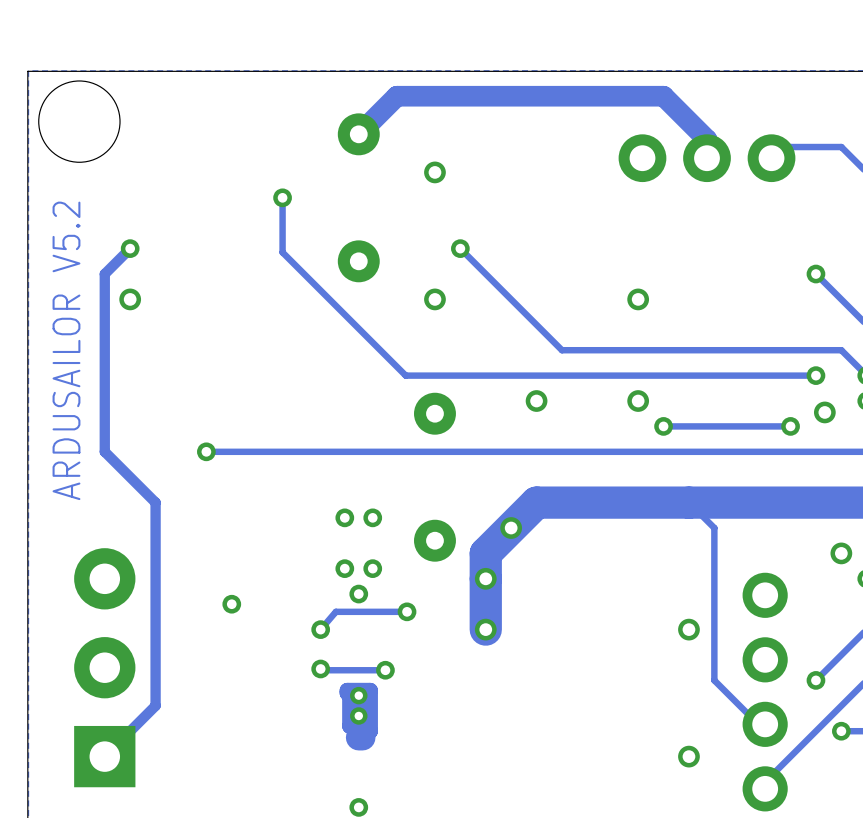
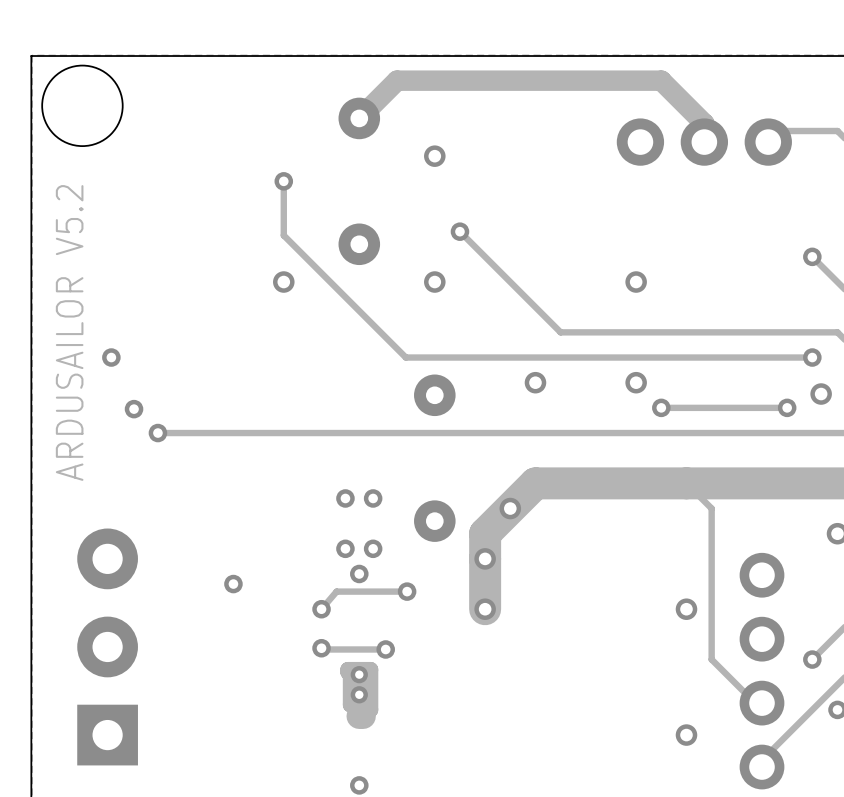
track: (130, 248) (104, 274) (104, 451) (155, 502) (155, 705) (104, 756) -> none
via: (130, 248) -> none
via position: (130, 299) -> (283, 282)
via: none -> (111, 357)
via: none -> (134, 409)
via: none -> (157, 433)
track: none -> (208, 433) (157, 433)
via: (206, 451) -> none

